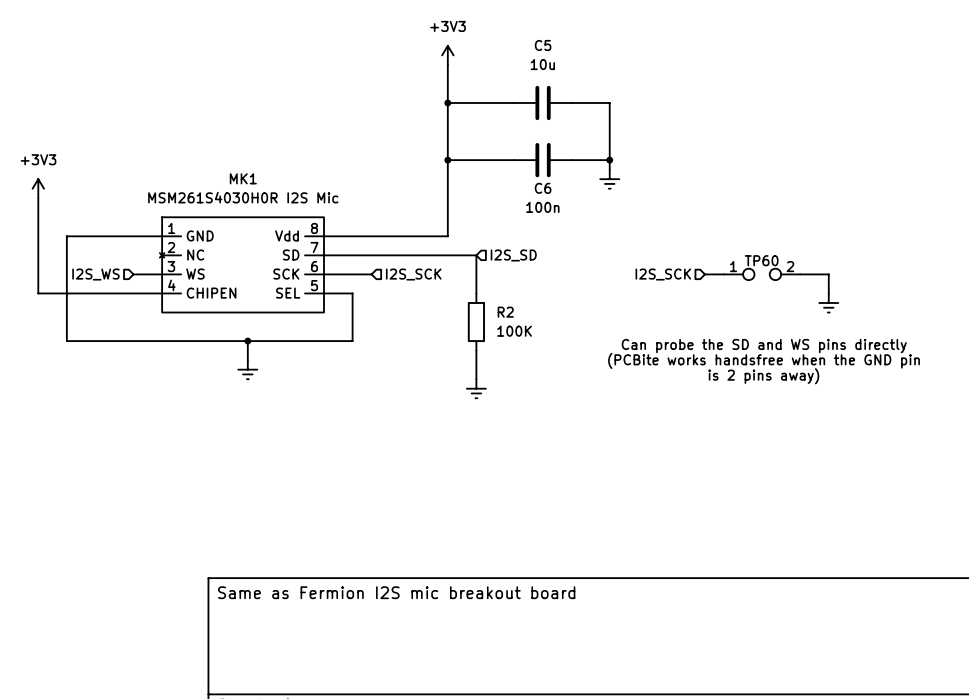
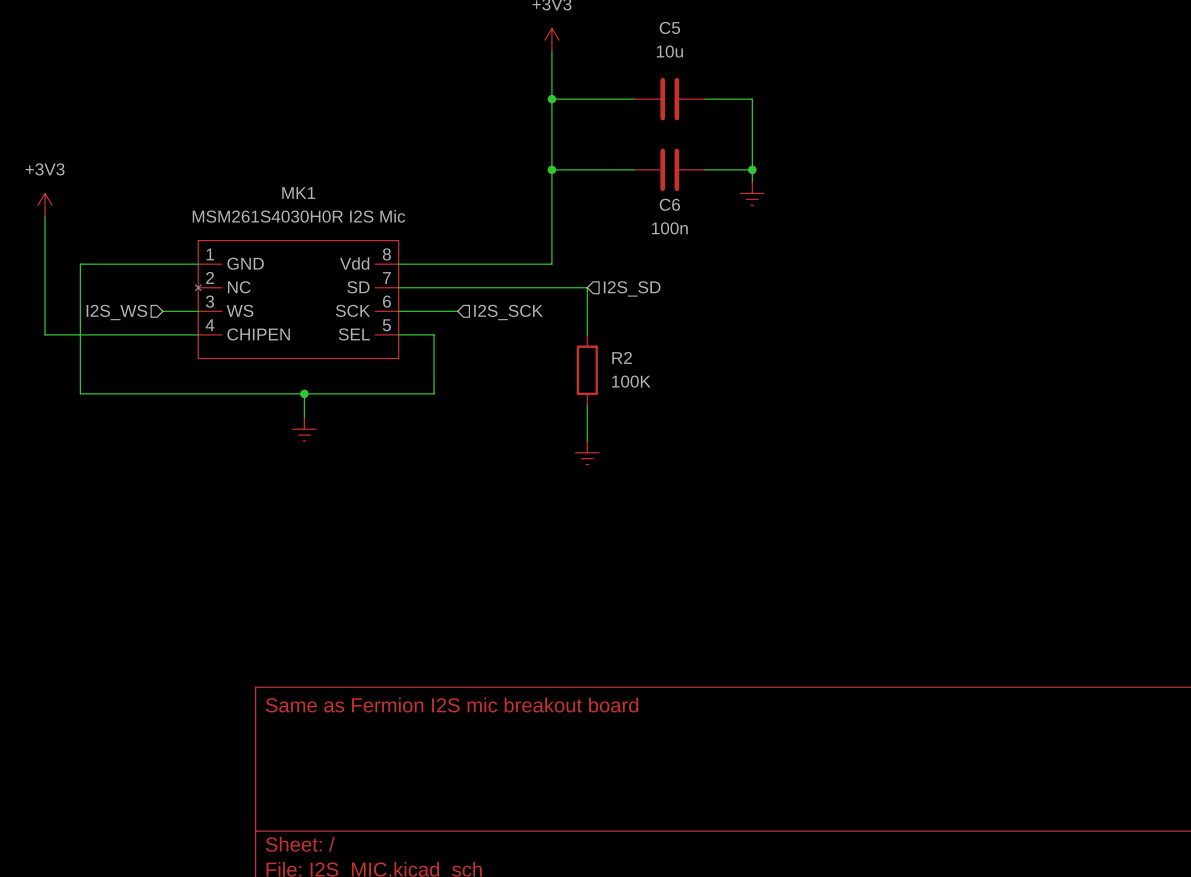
hierarchical label: I2S_SCK (663, 274) -> none
wire: (704, 274) (724, 274) -> none
TP60: (762, 274) -> none
wire: (800, 274) (828, 274) (828, 293) -> none
power symbol: (828, 302) -> none
text: Can probe the SD and WS pins directly (764, 346) -> none
text: (PCBite works handsfree when the GND pin (764, 360) -> none
text: is 2 pins away) (763, 376) -> none

